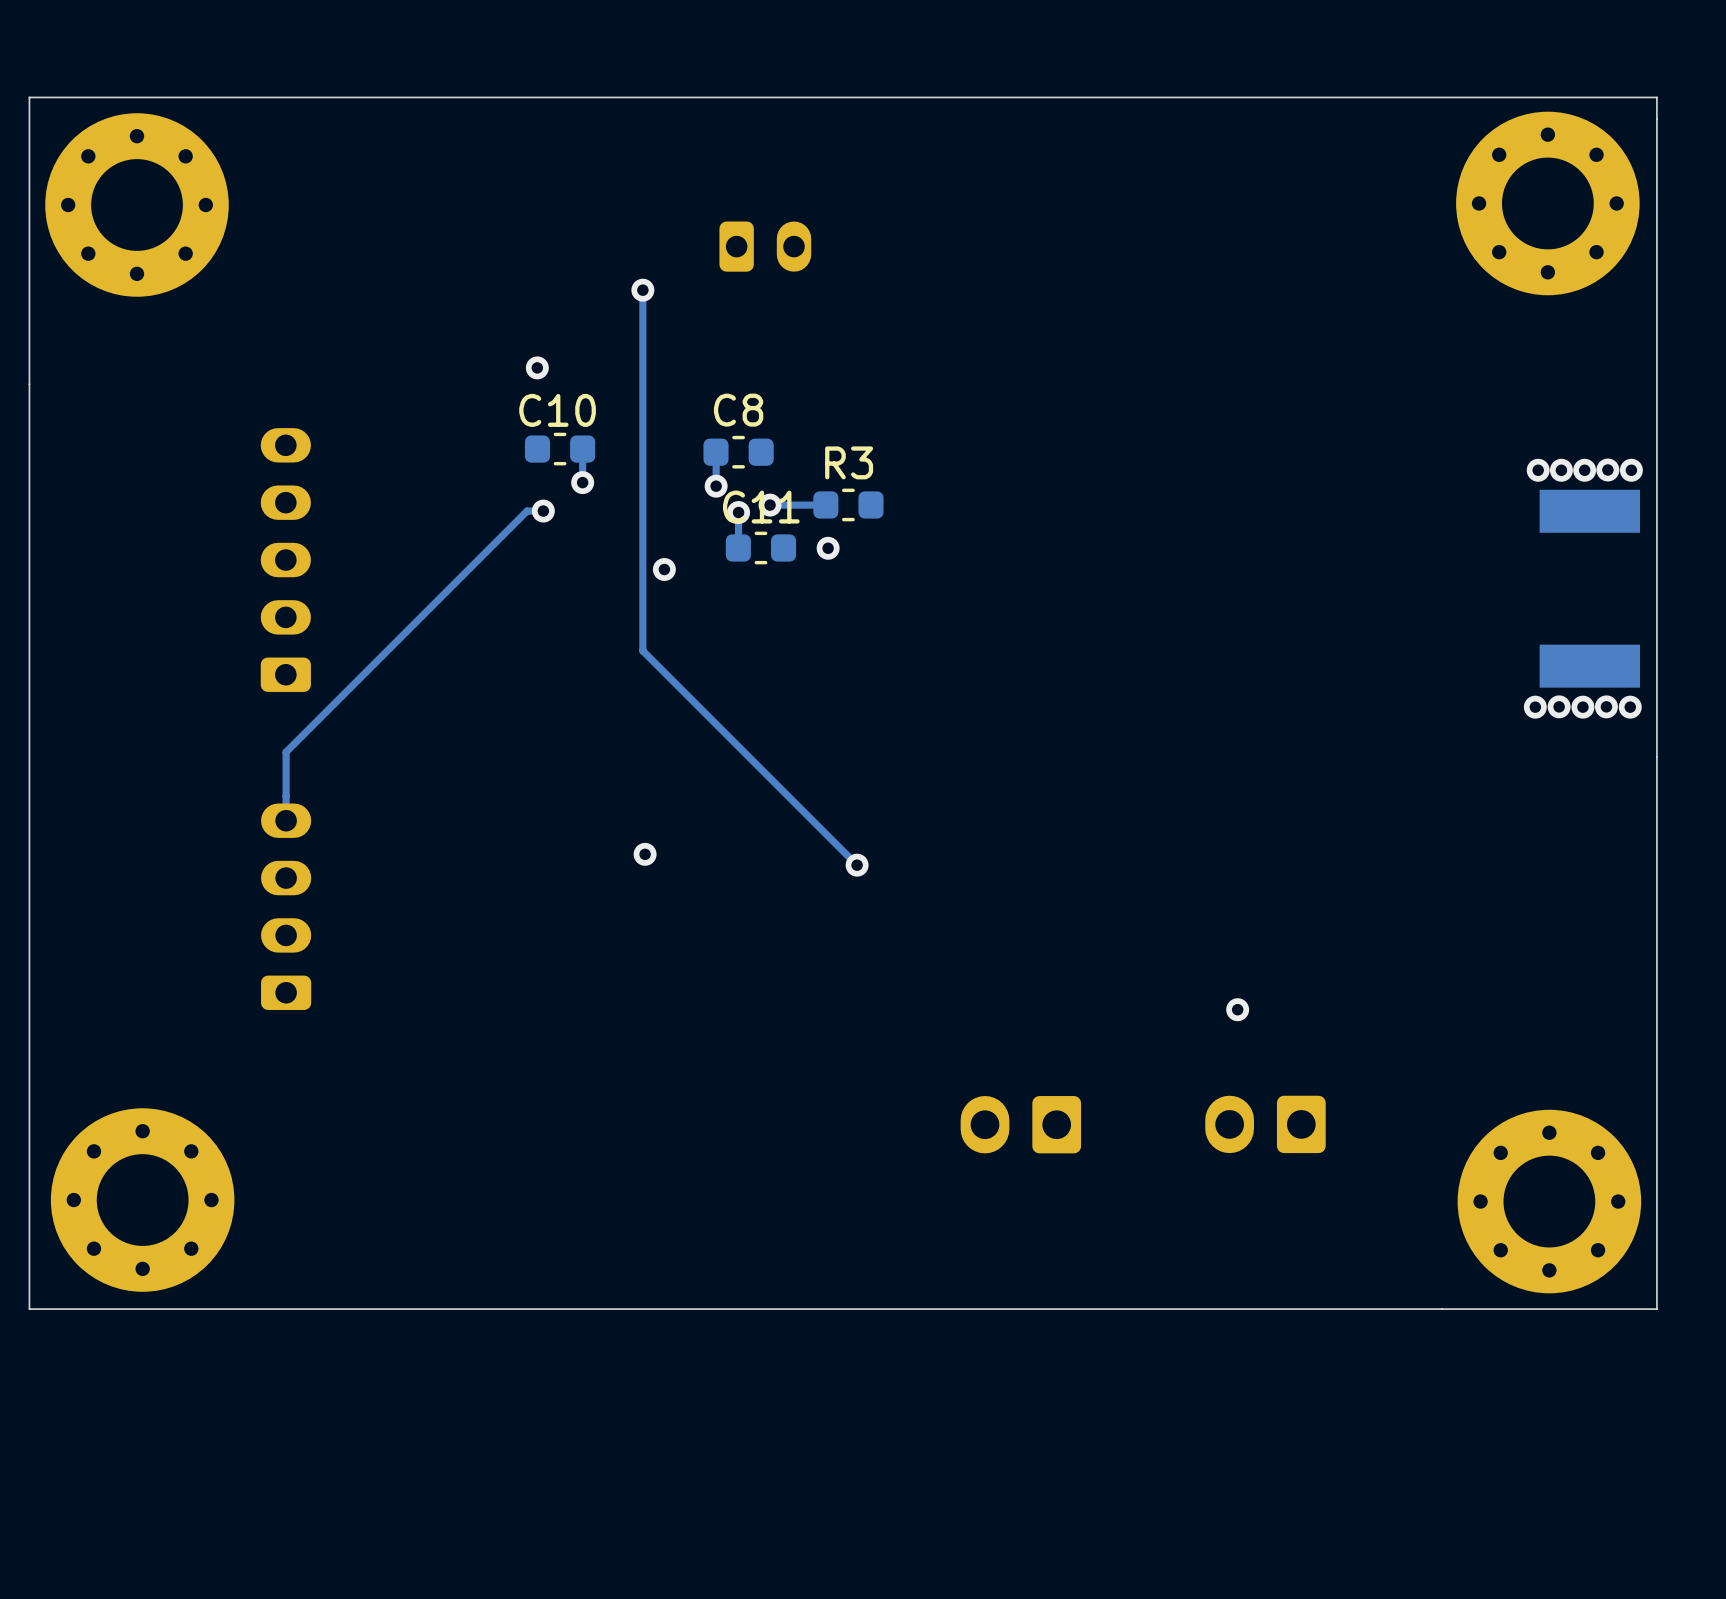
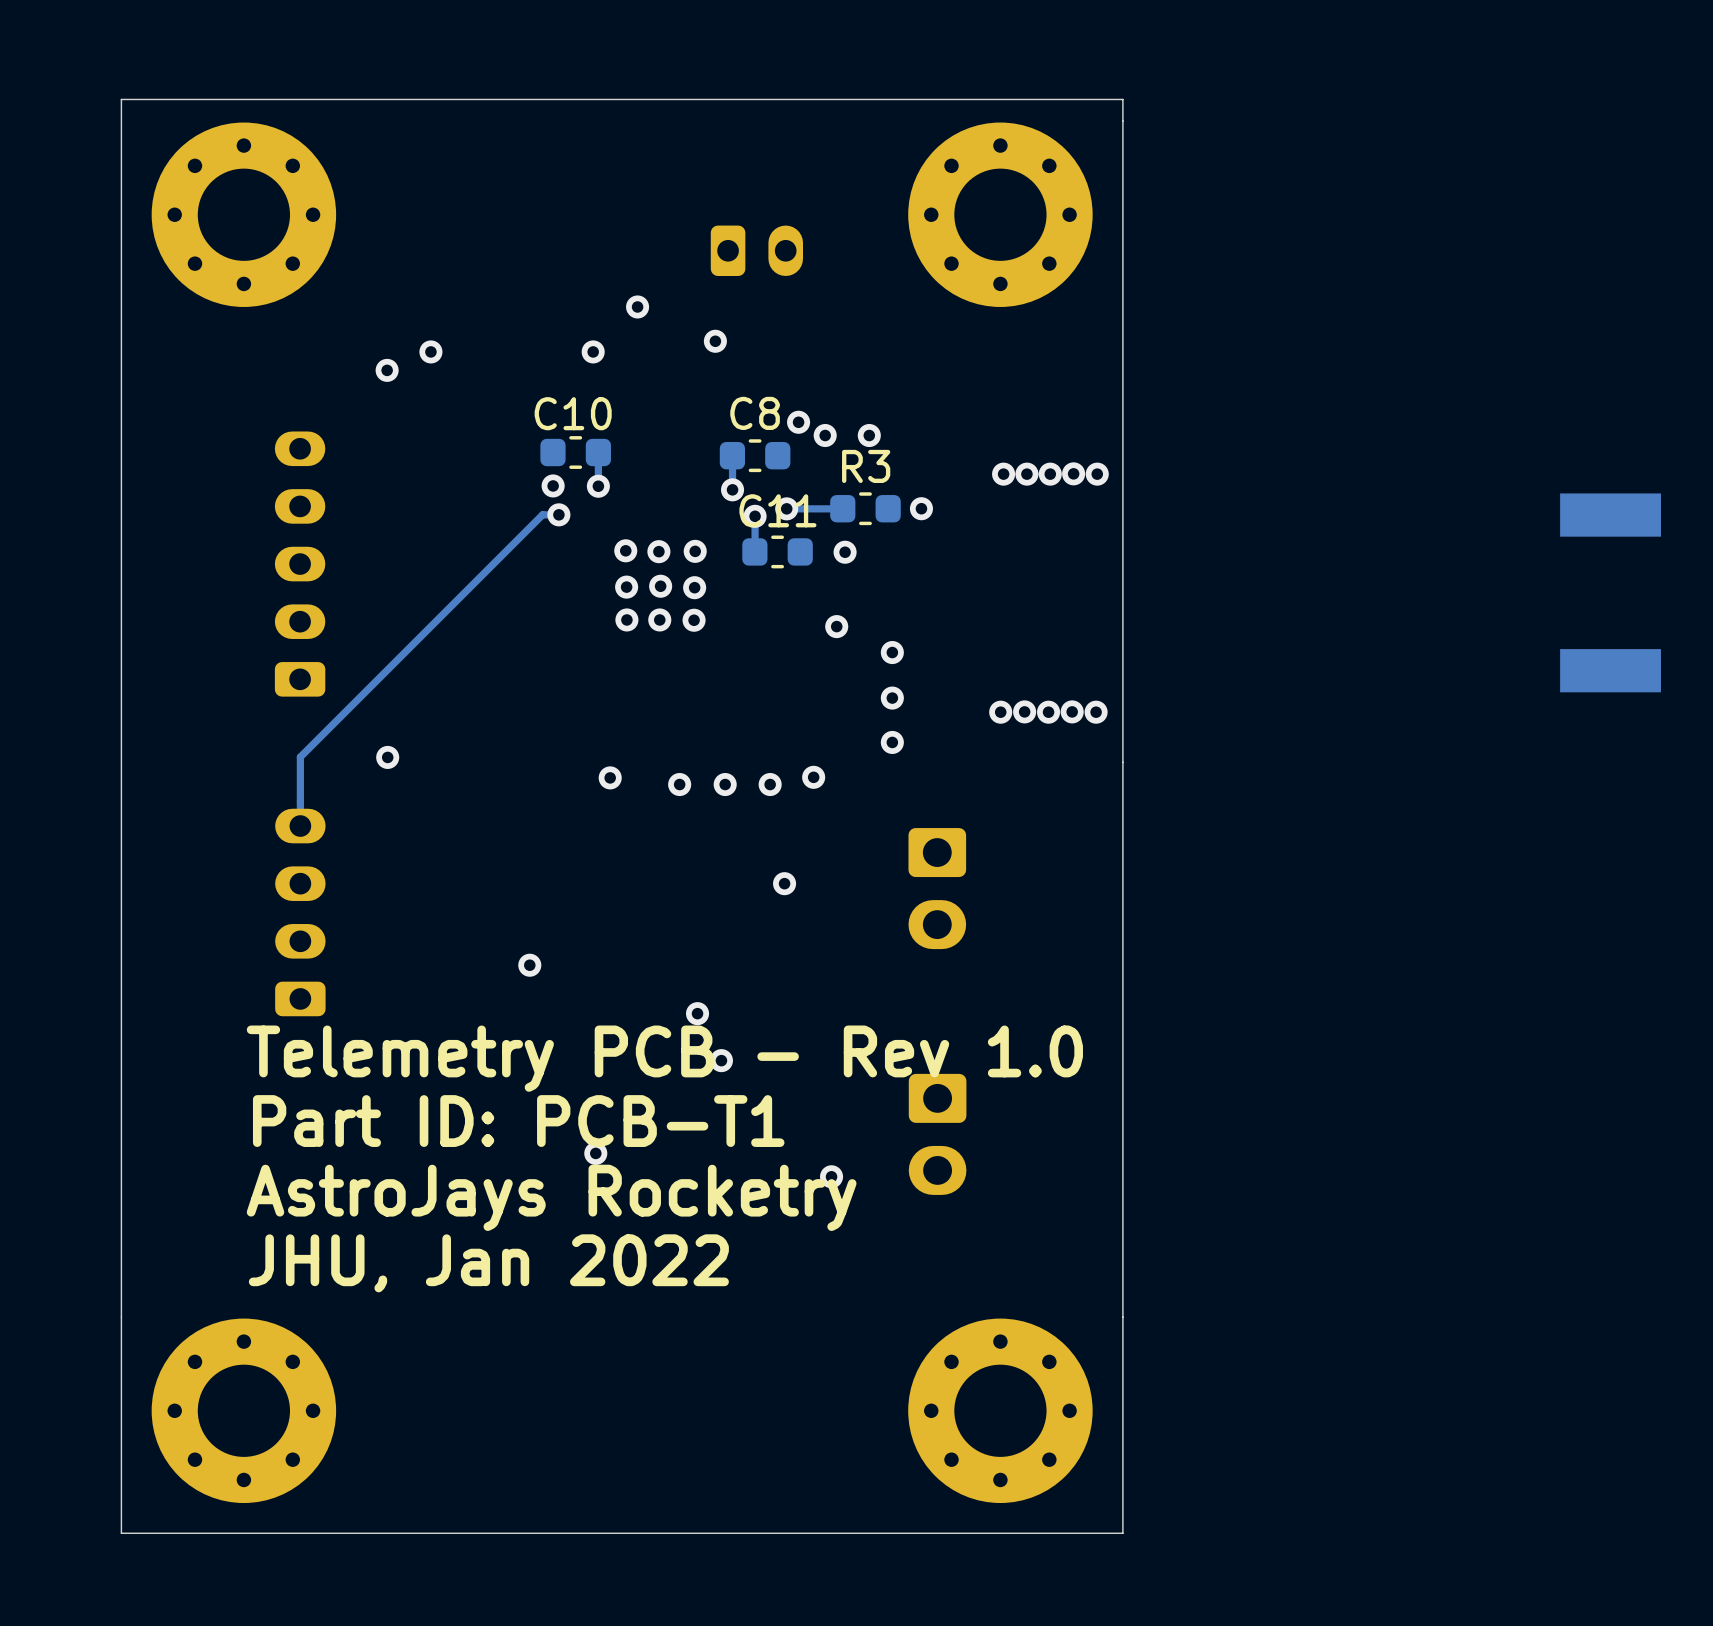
board edge: (1656, 97) (29, 97) (29, 1309) (1656, 1309) (1656, 97) -> (1122, 99) (1122, 1533) (121, 1533) (121, 99) (1122, 99)
part: (1547, 203) -> none
part position: (136, 205) -> (243, 214)
part: none -> (1000, 214)
part position: (765, 246) -> (756, 250)
track: (642, 290) (642, 650) (857, 865) -> none
via position: (642, 290) -> (637, 306)
via: none -> (715, 341)
via: none -> (430, 351)
via: none -> (593, 351)
via: none -> (387, 370)
via: (537, 367) -> none
via: none -> (798, 422)
via: none -> (825, 435)
via: none -> (869, 435)
via: (1607, 469) -> none
via: none -> (1003, 474)
via: none -> (1026, 474)
via: none -> (1050, 474)
via: none -> (1073, 473)
via: none -> (1097, 474)
via: (1538, 470) -> none
via: (1561, 470) -> none
via: (1584, 470) -> none
via: (1631, 470) -> none
via: none -> (553, 485)
via: none -> (921, 508)
via: none -> (625, 550)
via: none -> (658, 551)
via: none -> (695, 551)
via: (664, 569) -> none
via: none -> (626, 587)
via: none -> (660, 586)
via: none -> (694, 587)
via: none -> (626, 619)
via: none -> (659, 619)
via: none -> (694, 620)
via: none -> (836, 626)
via: none -> (892, 652)
via: none -> (892, 698)
via: (1559, 706) -> none
via: (1606, 706) -> none
via: none -> (1000, 712)
via: none -> (1024, 711)
via: none -> (1048, 712)
via: none -> (1072, 711)
via: none -> (1096, 712)
via: (1535, 707) -> none
via: (1582, 707) -> none
via: (1630, 707) -> none
via: none -> (892, 742)
via: none -> (387, 757)
via: none -> (610, 777)
via: none -> (813, 777)
via: none -> (679, 784)
via: none -> (725, 784)
via: none -> (770, 784)
via: (645, 854) -> none
via: (857, 865) -> none
via: none -> (784, 883)
part: none -> (937, 888)
via: none -> (529, 965)
via: none -> (697, 1013)
via: (1237, 1009) -> none
text: none -> Telemetry PCB - Rev 1.0 (664, 1058)
via: none -> (721, 1060)
text: none -> Part ID: PCB-T1 (518, 1121)
part rotation: 0° (1020, 1124) -> 90° counterclockwise (937, 1134)
part position: (1020, 1124) -> (937, 1134)
part: (1265, 1124) -> none
via: none -> (595, 1153)
via: none -> (831, 1176)
text: none -> AstroJays Rocketry (551, 1197)
part position: (142, 1200) -> (243, 1410)
part: (1549, 1201) -> none
text: none -> JHU, Jan 2022 (488, 1263)
part: none -> (1000, 1410)

